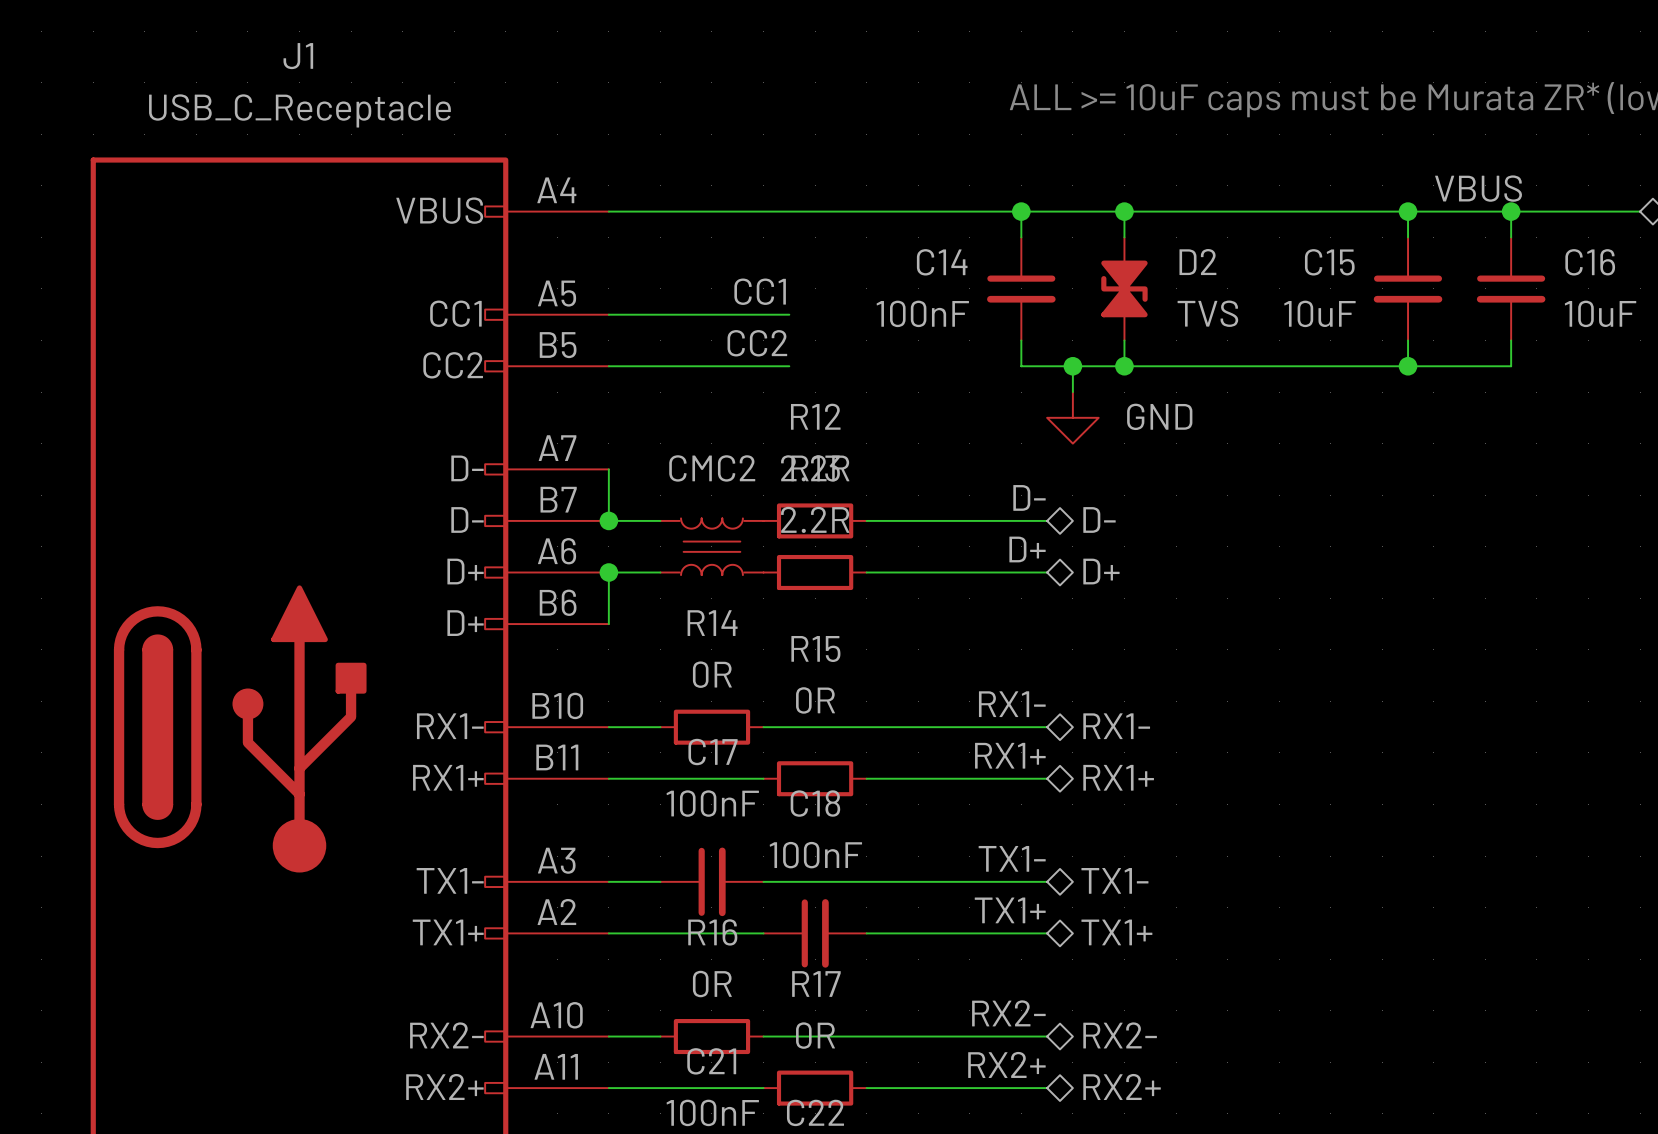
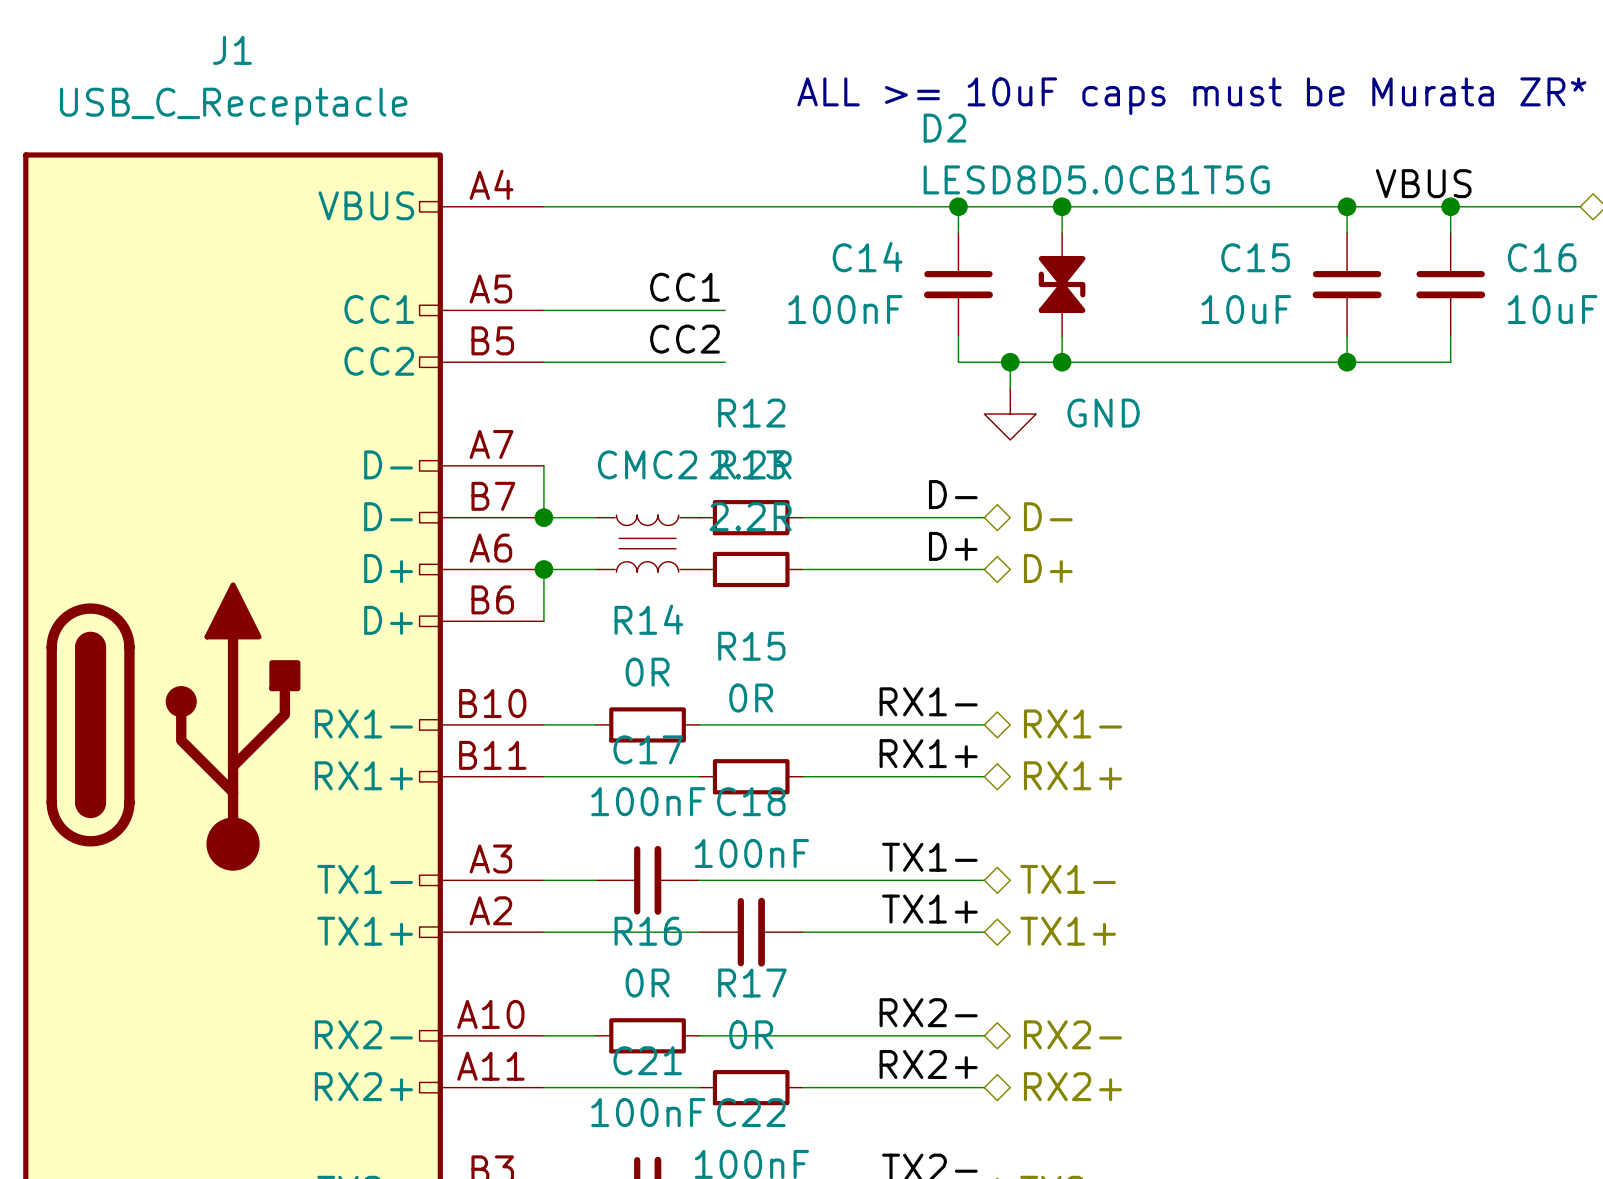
D2 name position: D2 (1197, 262) -> D2 (944, 128)
D2 value: TVS (1207, 313) -> LESD8D5.0CB1T5G (1096, 179)

